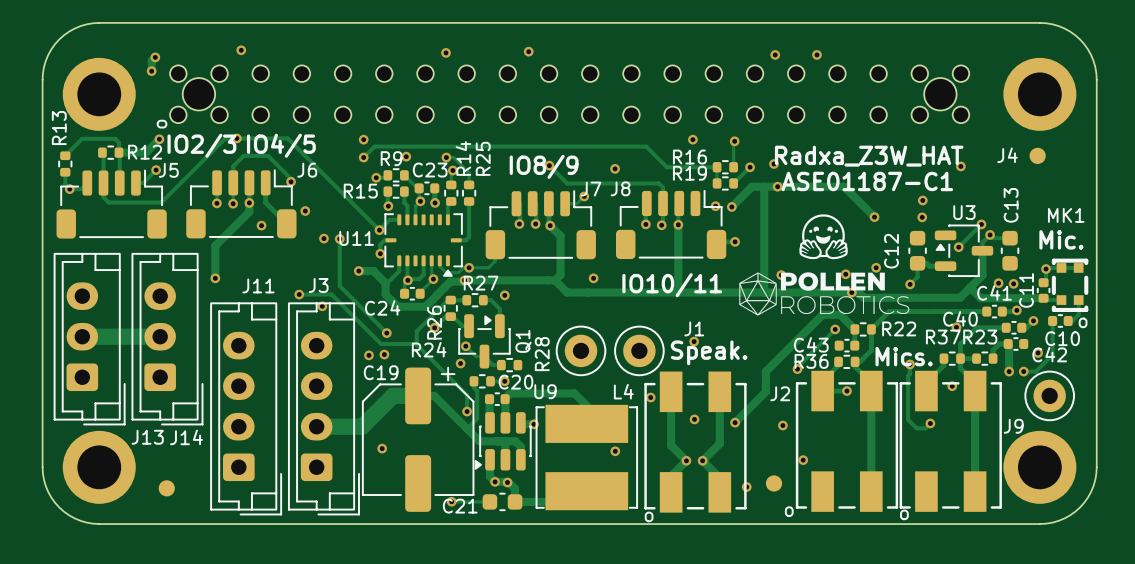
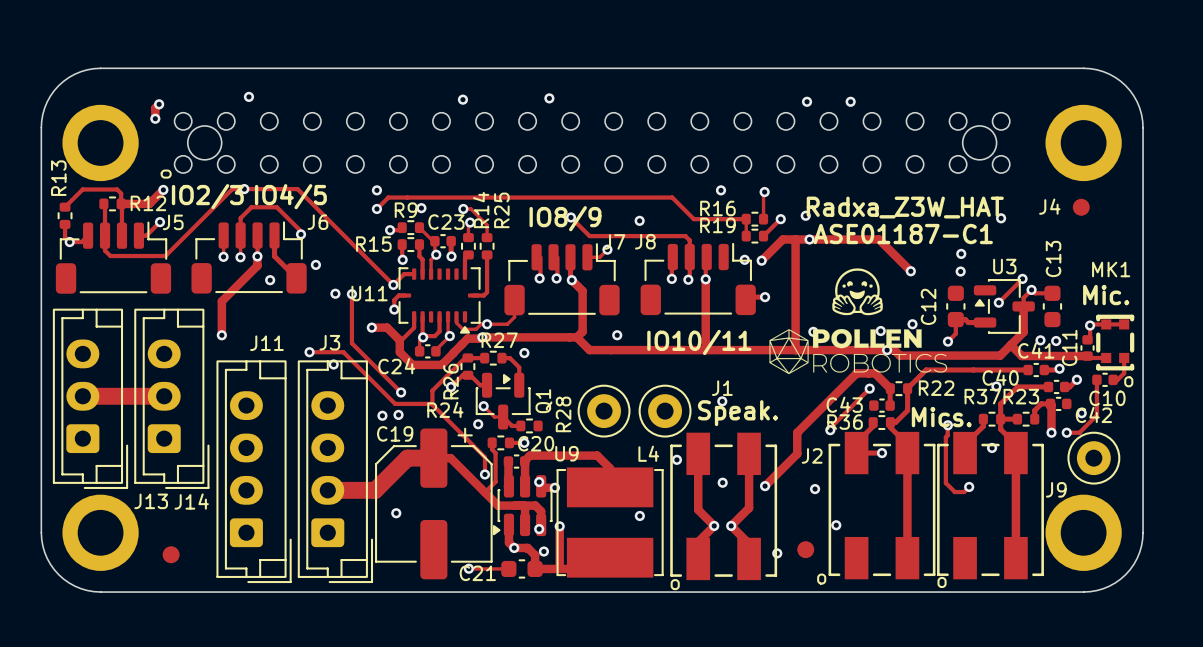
via: none -> (539, 482)
track: none -> (559, 526) (559, 568)
via: none -> (559, 526)
via: none -> (539, 529)
via: (507, 482) -> none
via: none -> (543, 551)

